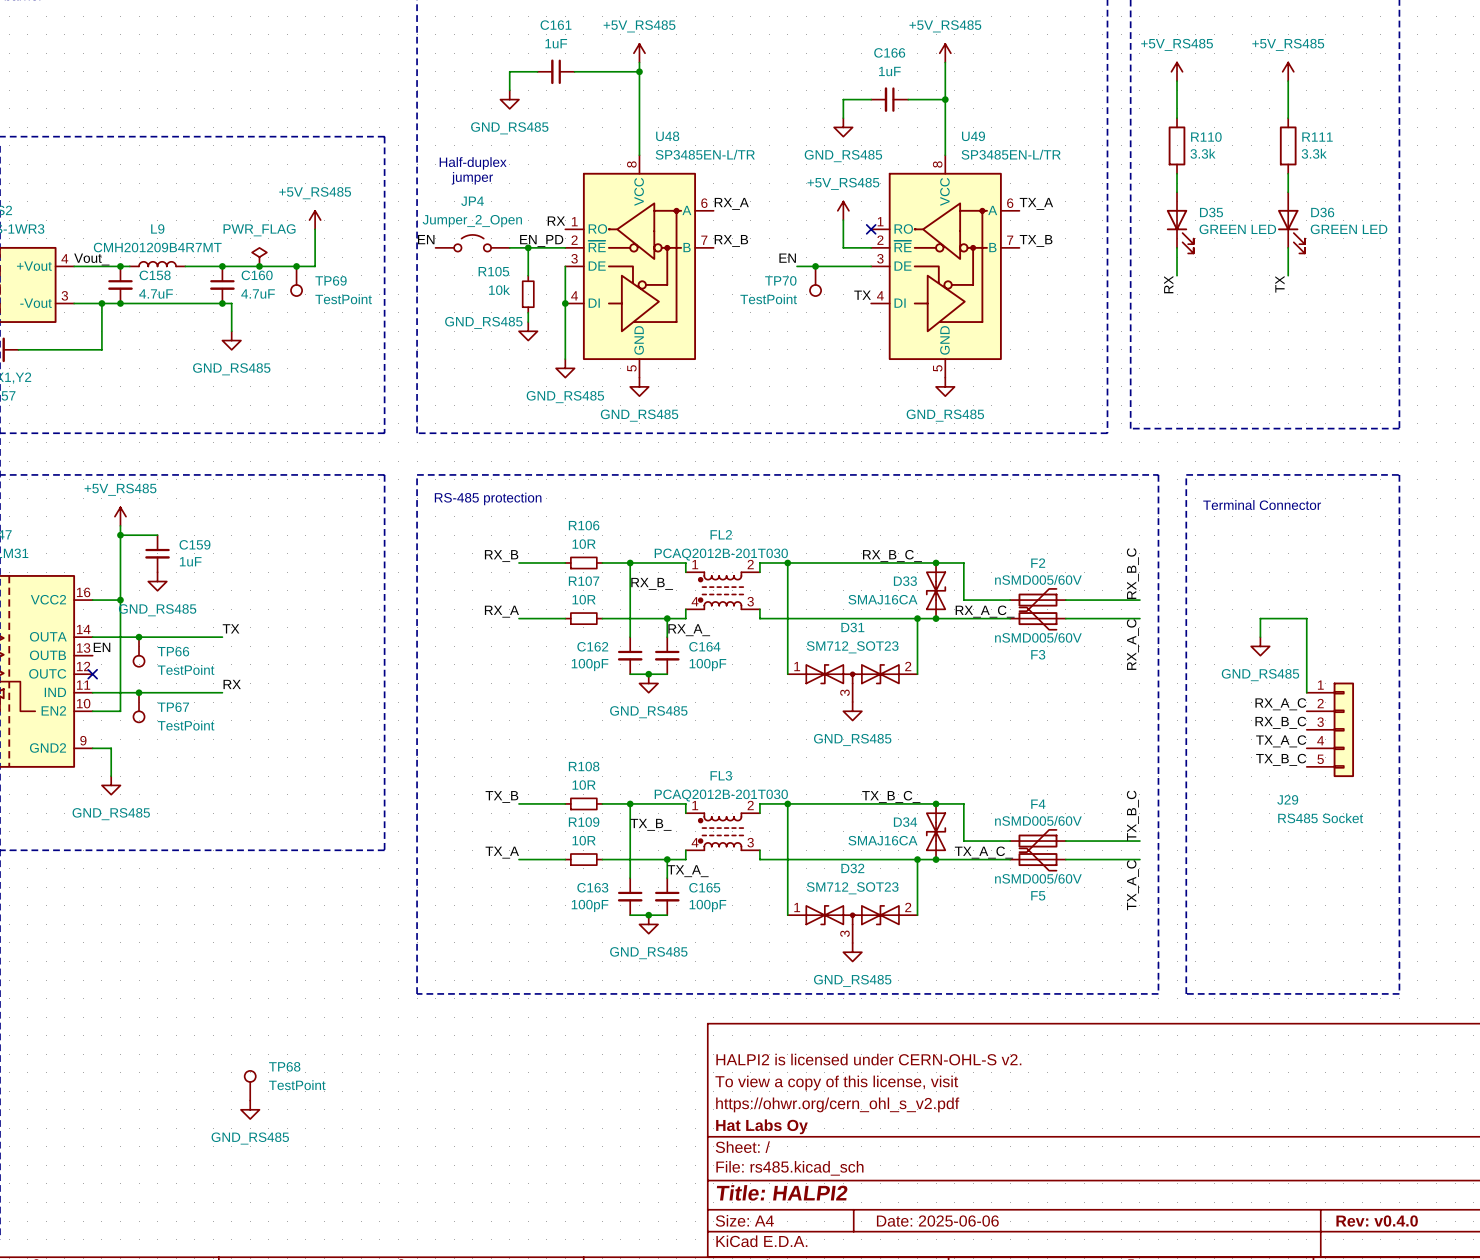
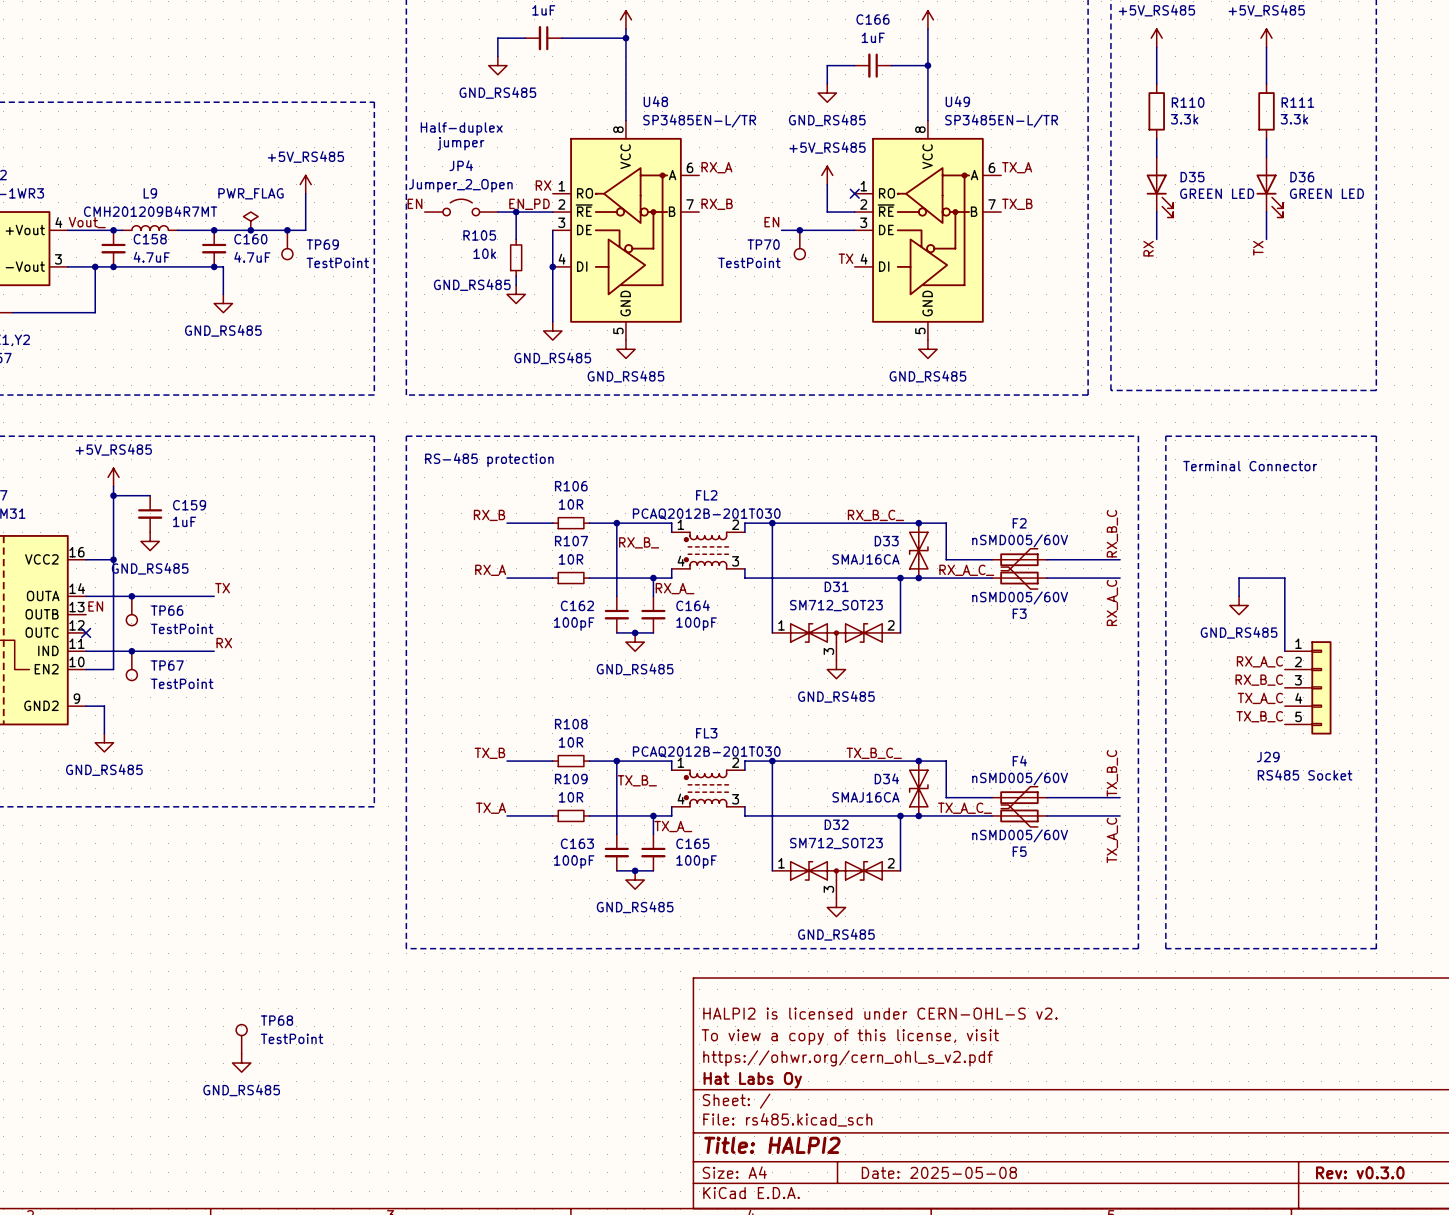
title block: Date: 2025-06-06 (937, 1221) -> Date: 2025-05-08 (939, 1172)
title block: Rev: v0.4.0 (1377, 1221) -> Rev: v0.3.0 (1360, 1172)

